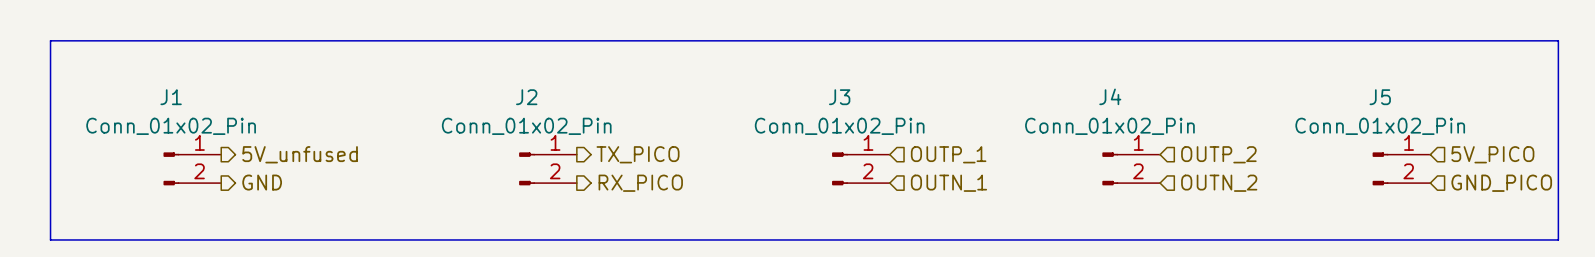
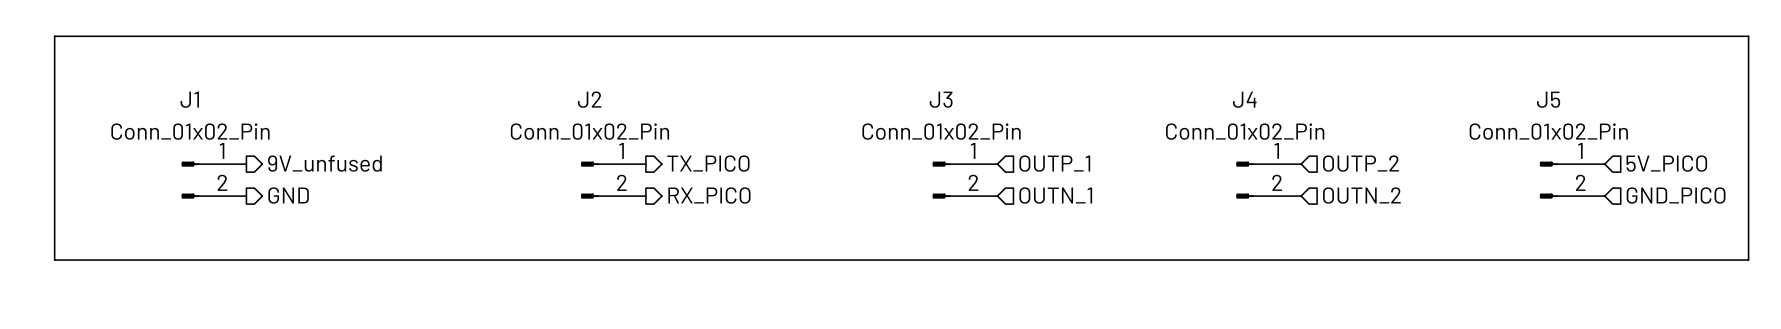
hierarchical label: 5V_unfused (300, 154) -> 9V_unfused (324, 163)

